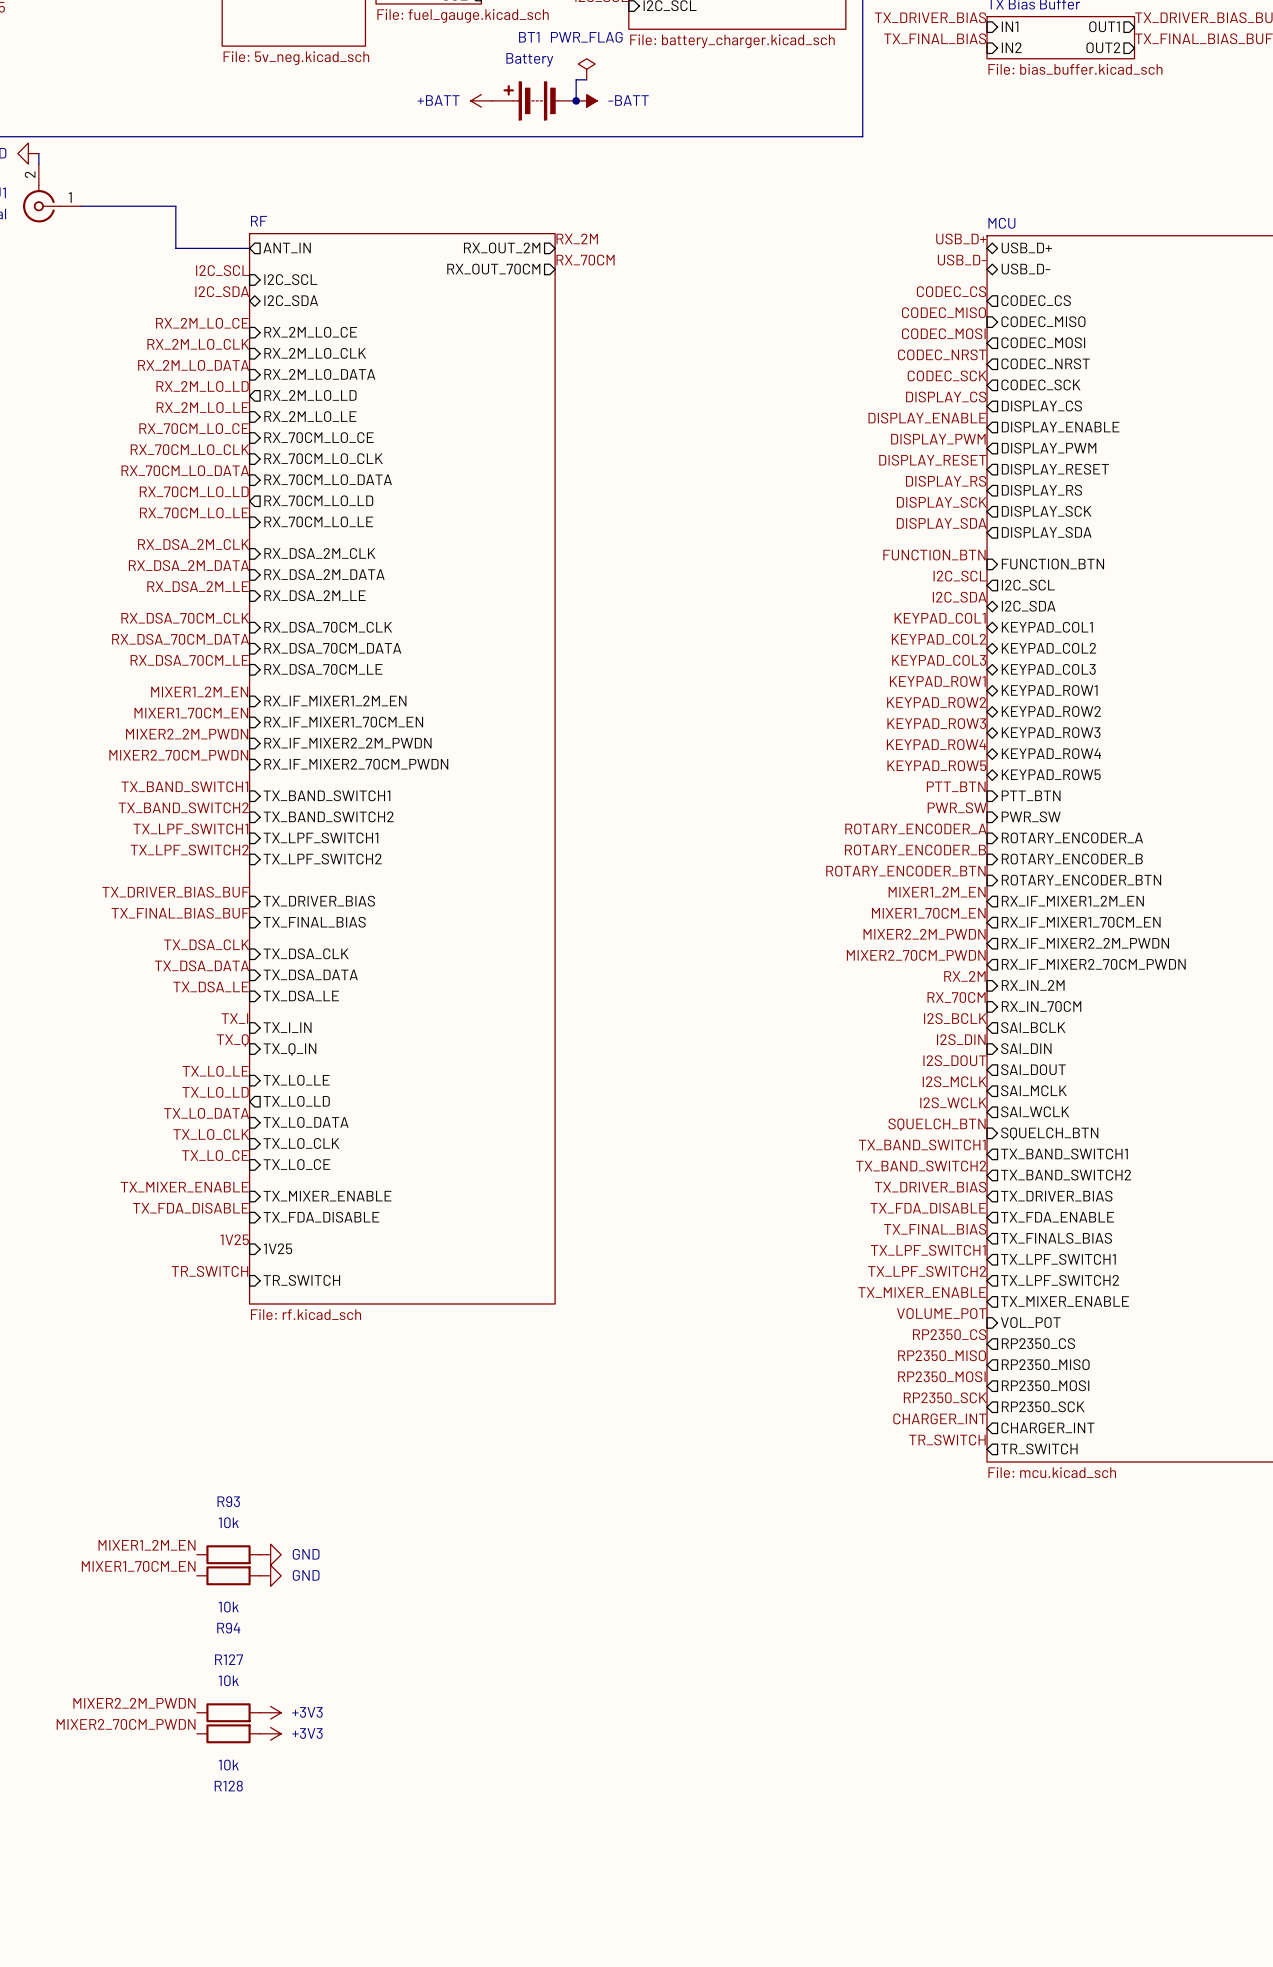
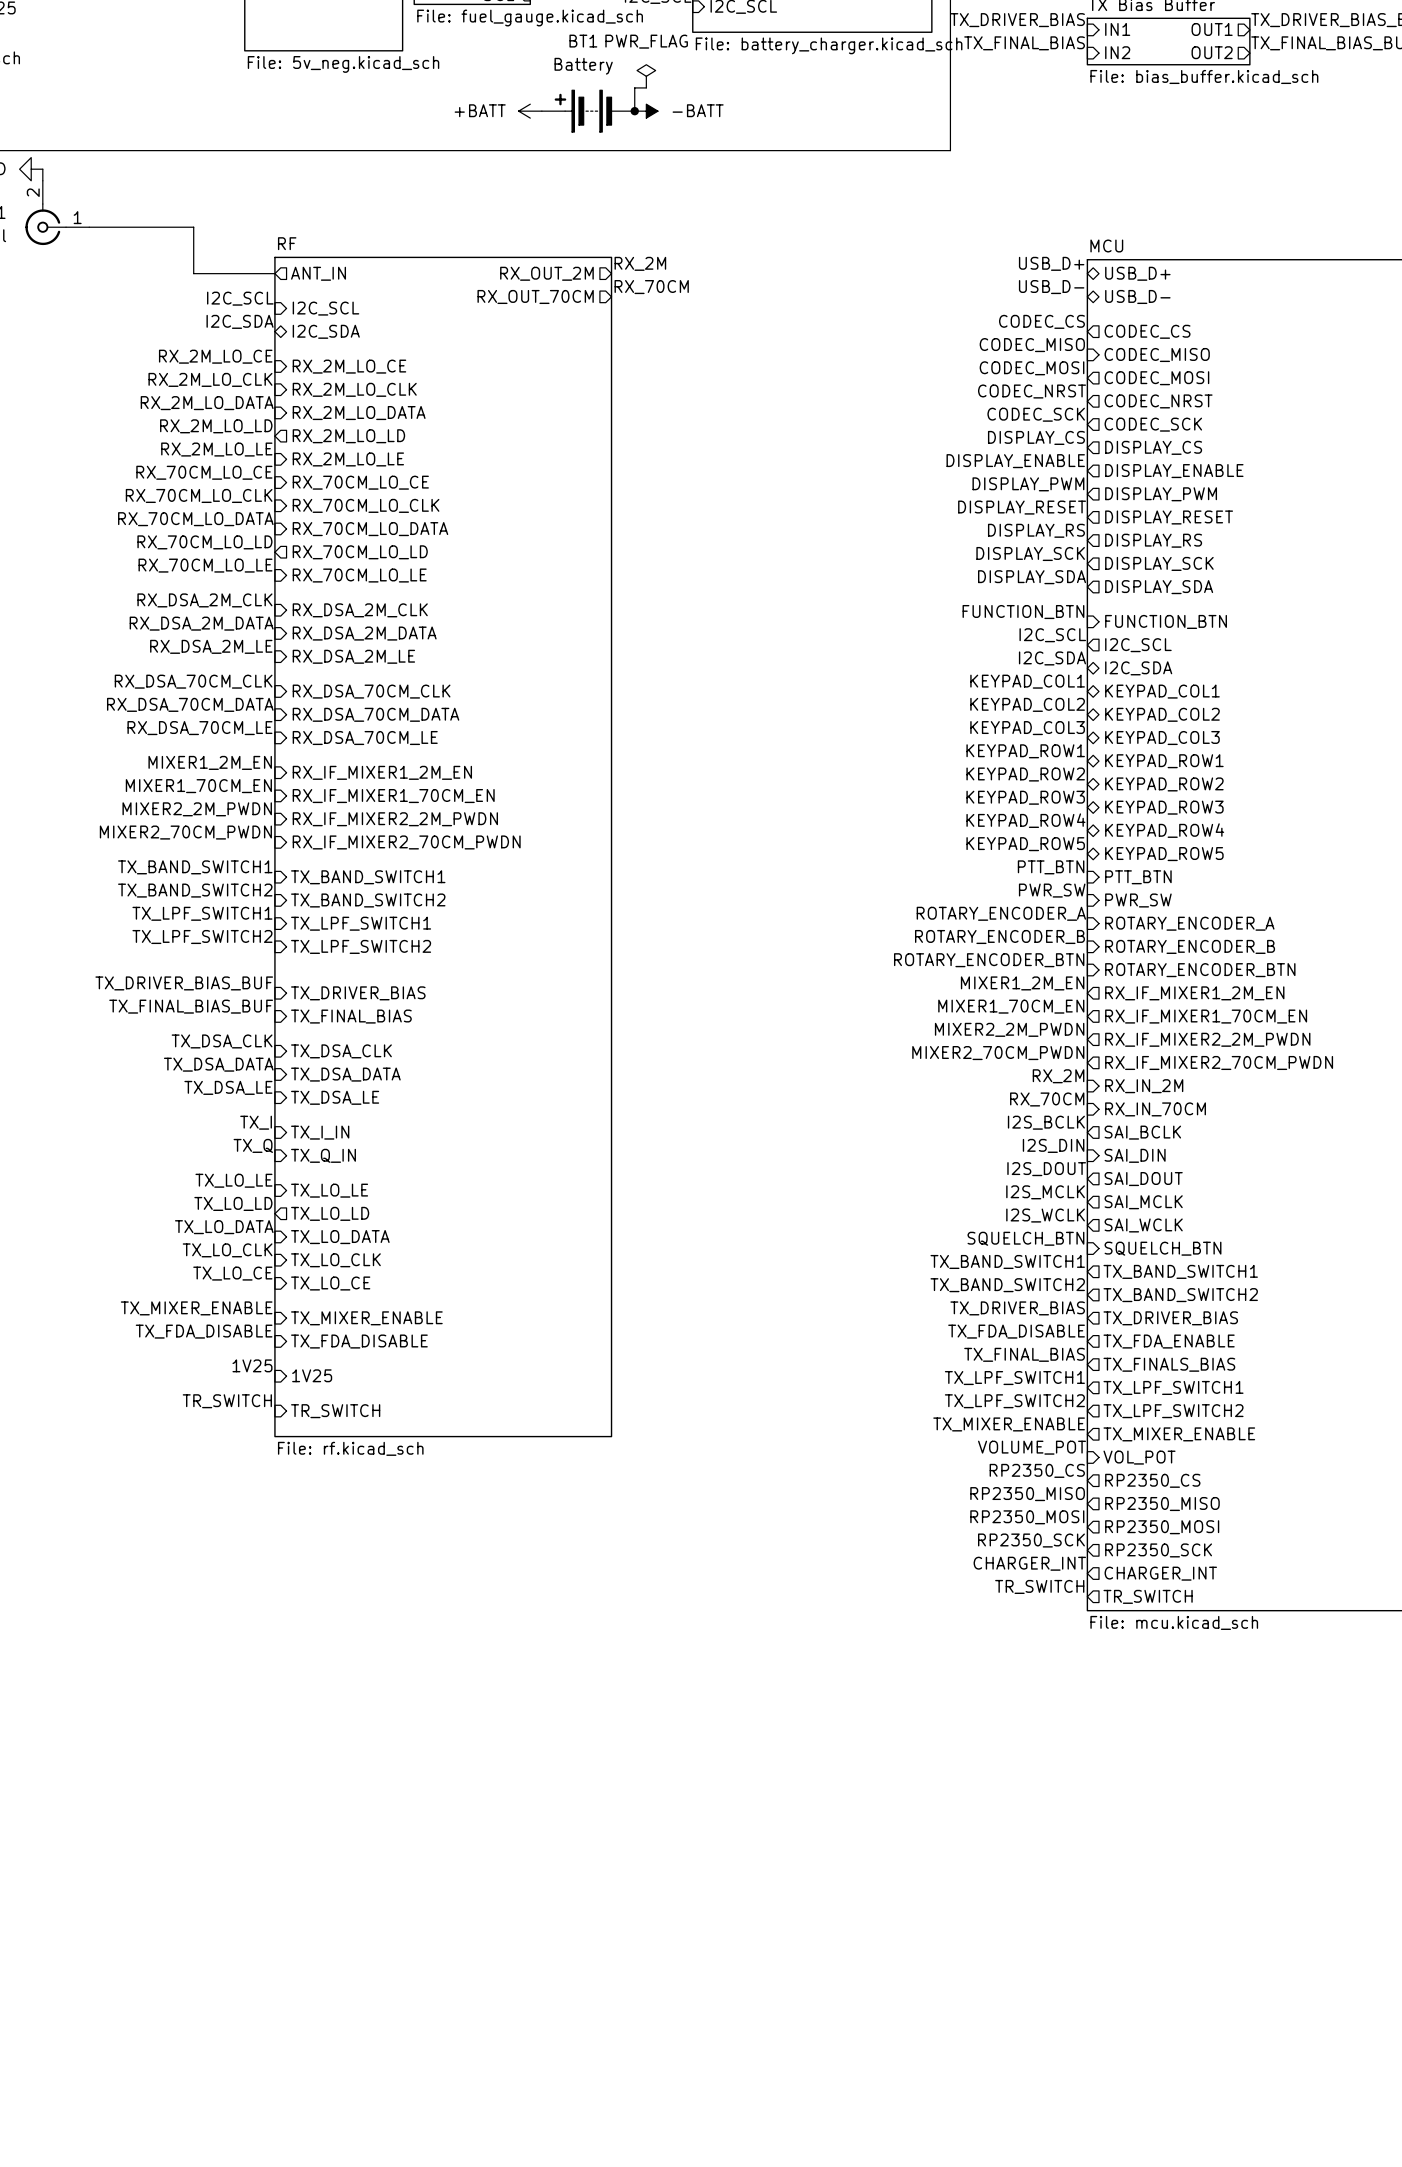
label: MIXER1_2M_EN (147, 1545) -> none
R93: 10k (228, 1554) -> none
power symbol: GND (270, 1554) -> none
label: MIXER1_70CM_EN (138, 1566) -> none
R94: 10k (228, 1575) -> none
power symbol: GND (270, 1575) -> none
label: MIXER2_2M_PWDN (134, 1703) -> none
R127: 10k (228, 1712) -> none
power symbol: +3V3 (270, 1712) -> none
label: MIXER2_70CM_PWDN (126, 1724) -> none
R128: 10k (228, 1733) -> none
power symbol: +3V3 (270, 1733) -> none

